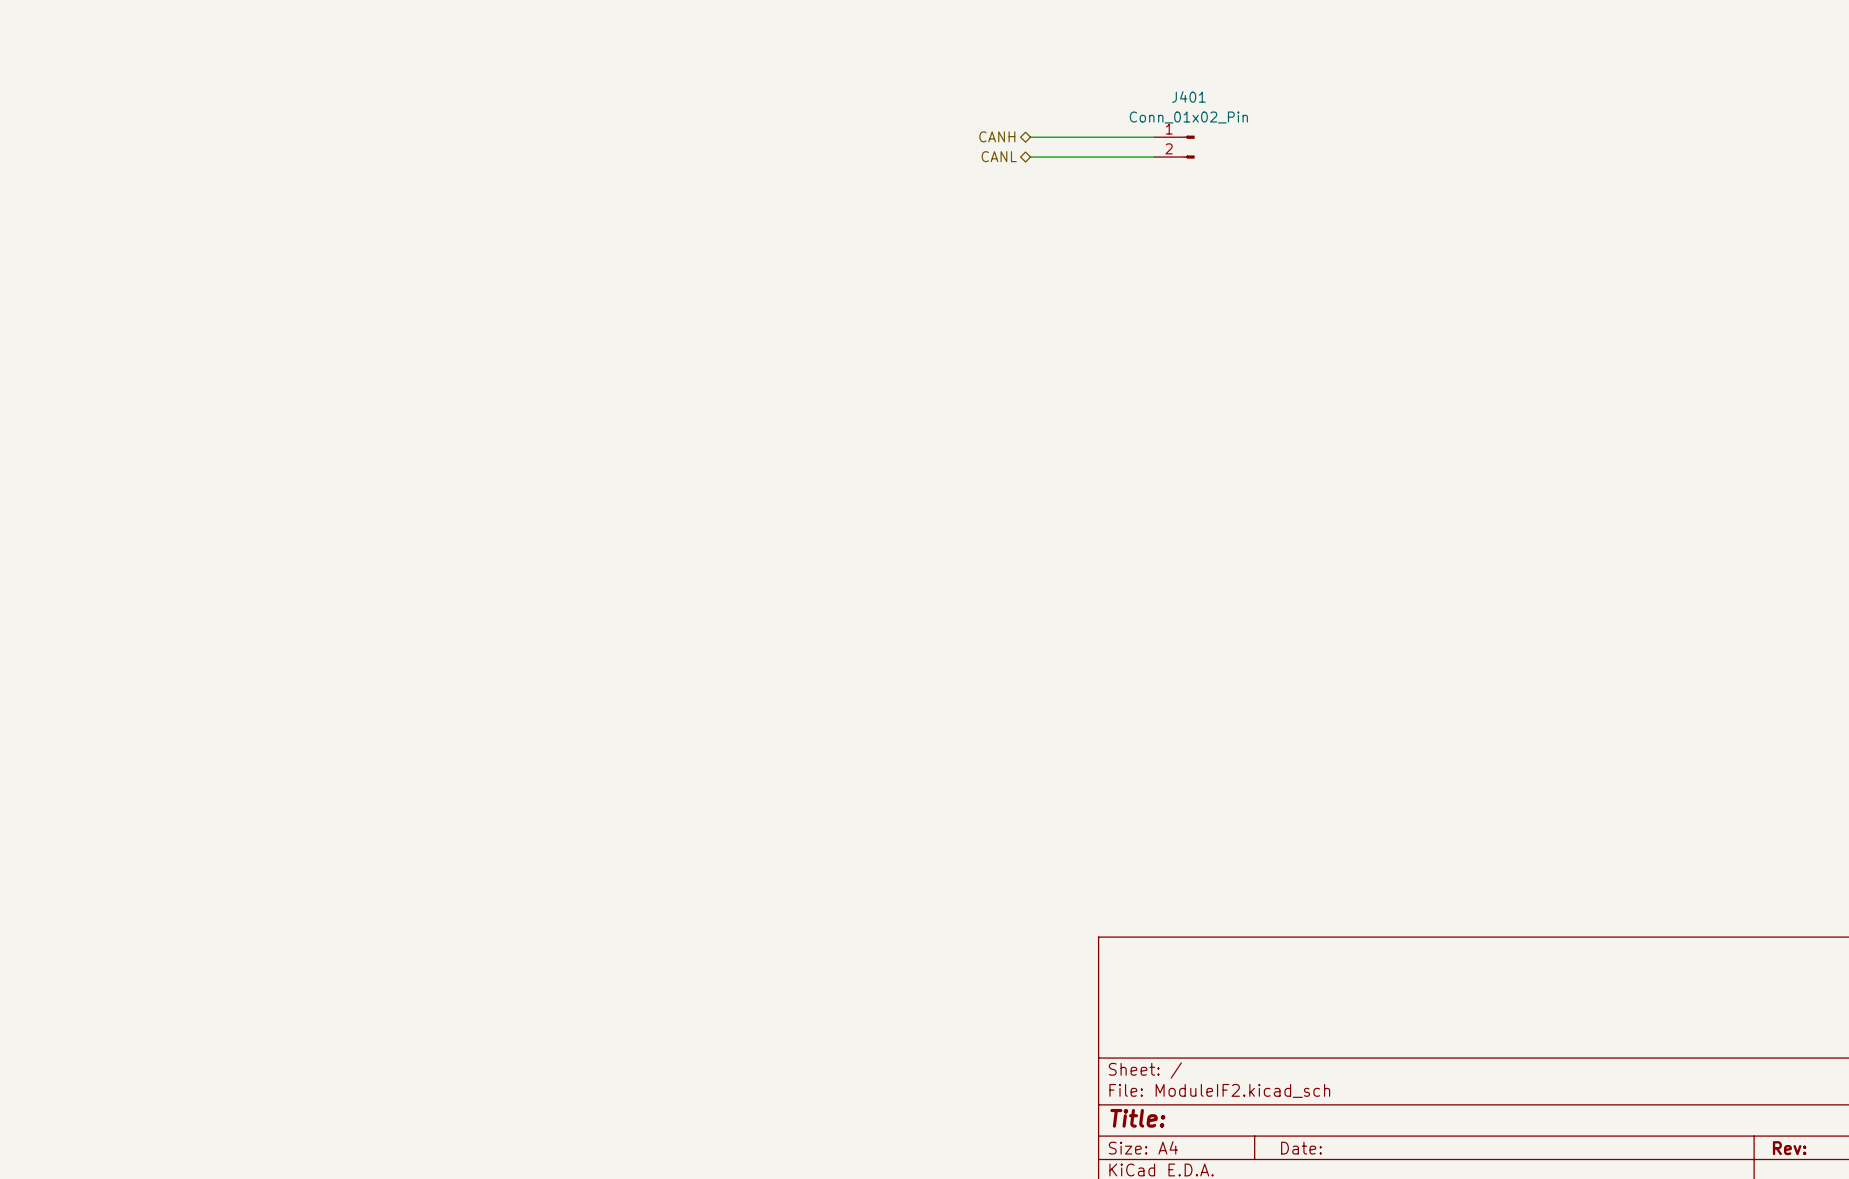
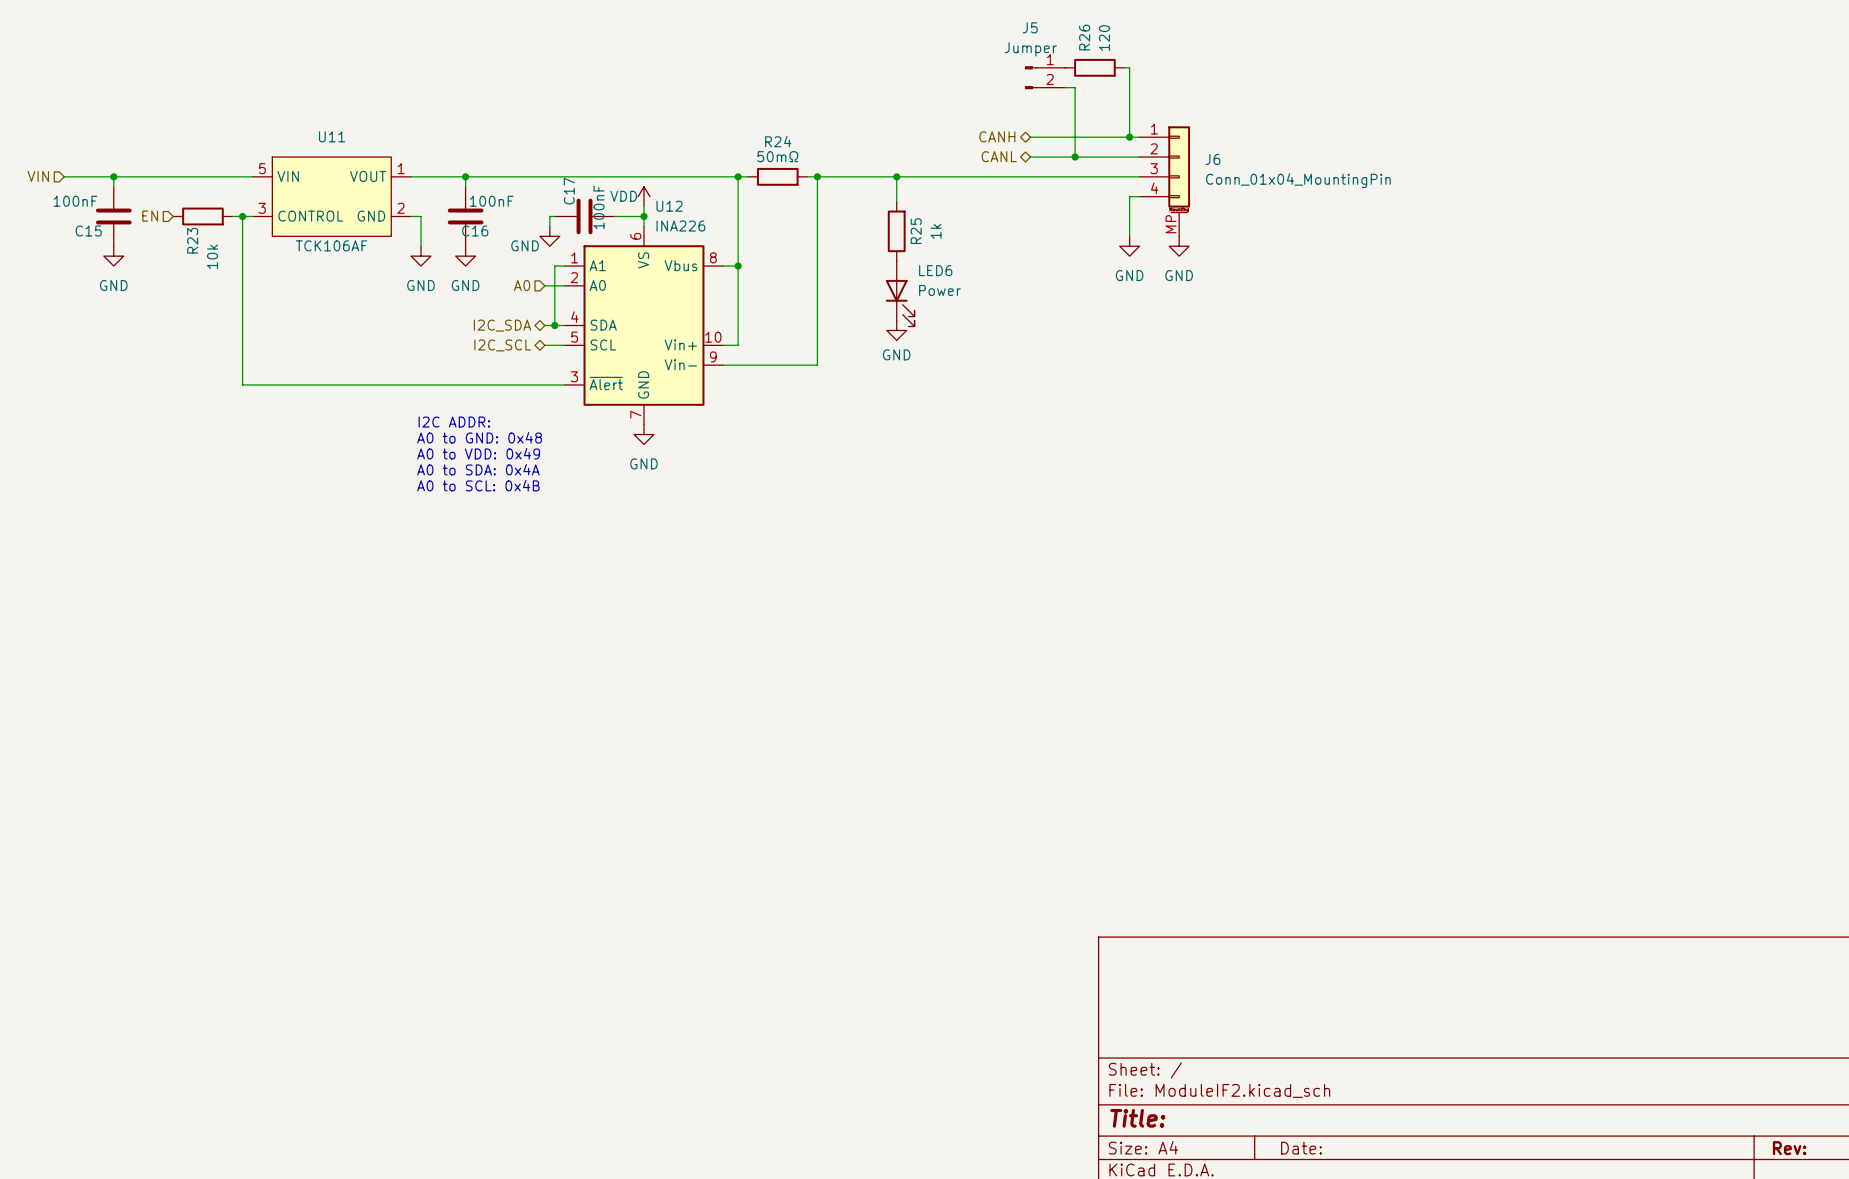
R26: none -> 120 (1094, 67)
wire: none -> (1124, 67) (1129, 67) (1129, 137)
J5: none -> Jumper (1045, 77)
wire: none -> (1065, 87) (1075, 87) (1075, 157)
junction: none -> (1129, 137)
J401: Conn_01x02_Pin (1174, 147) -> none
junction: none -> (1075, 157)
hierarchical label: none -> VIN (38, 176)
wire: none -> (64, 176) (252, 176)
wire: none -> (113, 176) (113, 186)
junction: none -> (113, 176)
wire: none -> (411, 176) (748, 176)
wire: none -> (465, 176) (465, 186)
junction: none -> (465, 176)
wire: none -> (738, 176) (738, 345) (723, 345)
junction: none -> (738, 176)
R24: none -> 50mΩ (777, 176)
wire: none -> (807, 176) (1139, 176)
wire: none -> (817, 176) (817, 365) (723, 365)
junction: none -> (817, 176)
wire: none -> (896, 176) (896, 201)
junction: none -> (896, 176)
J6: none -> Conn_01x04_MountingPin (1164, 181)
U11: none -> TCK106AF (331, 196)
power symbol: none -> VDD (643, 196)
wire: none -> (1139, 196) (1129, 196) (1129, 236)
wire: none -> (643, 206) (643, 226)
C15: none -> 100nF (113, 216)
hierarchical label: none -> EN (150, 216)
R23: none -> 10k (202, 216)
wire: none -> (232, 216) (252, 216)
wire: none -> (242, 216) (242, 384) (564, 384)
junction: none -> (242, 216)
wire: none -> (411, 216) (421, 216) (421, 246)
C16: none -> 100nF (465, 216)
wire: none -> (554, 216) (549, 216) (549, 226)
C17: none -> 100nF (584, 216)
wire: none -> (614, 216) (643, 216)
junction: none -> (643, 216)
R25: none -> 1k (896, 231)
power symbol: none -> GND (549, 236)
power symbol: none -> GND (1129, 246)
power symbol: none -> GND (1179, 246)
power symbol: none -> GND (113, 256)
power symbol: none -> GND (421, 256)
power symbol: none -> GND (465, 256)
wire: none -> (564, 266) (554, 266) (554, 325)
wire: none -> (723, 266) (738, 266)
junction: none -> (738, 266)
hierarchical label: none -> A0 (522, 285)
wire: none -> (544, 285) (564, 285)
LED6: none -> Power (900, 293)
hierarchical label: none -> I2C_SDA (502, 325)
wire: none -> (544, 325) (564, 325)
junction: none -> (554, 325)
U12: none -> INA226 (643, 325)
power symbol: none -> GND (896, 330)
hierarchical label: none -> I2C_SCL (502, 345)
wire: none -> (544, 345) (564, 345)
text: none -> I2C ADDR: (454, 422)
power symbol: none -> GND (643, 434)
text: none -> A0 to GND: 0x48 (479, 437)
text: none -> A0 to VDD: 0x49 (478, 453)
text: none -> A0 to SDA: 0x4A (478, 469)
text: none -> A0 to SCL: 0x4B (478, 485)

